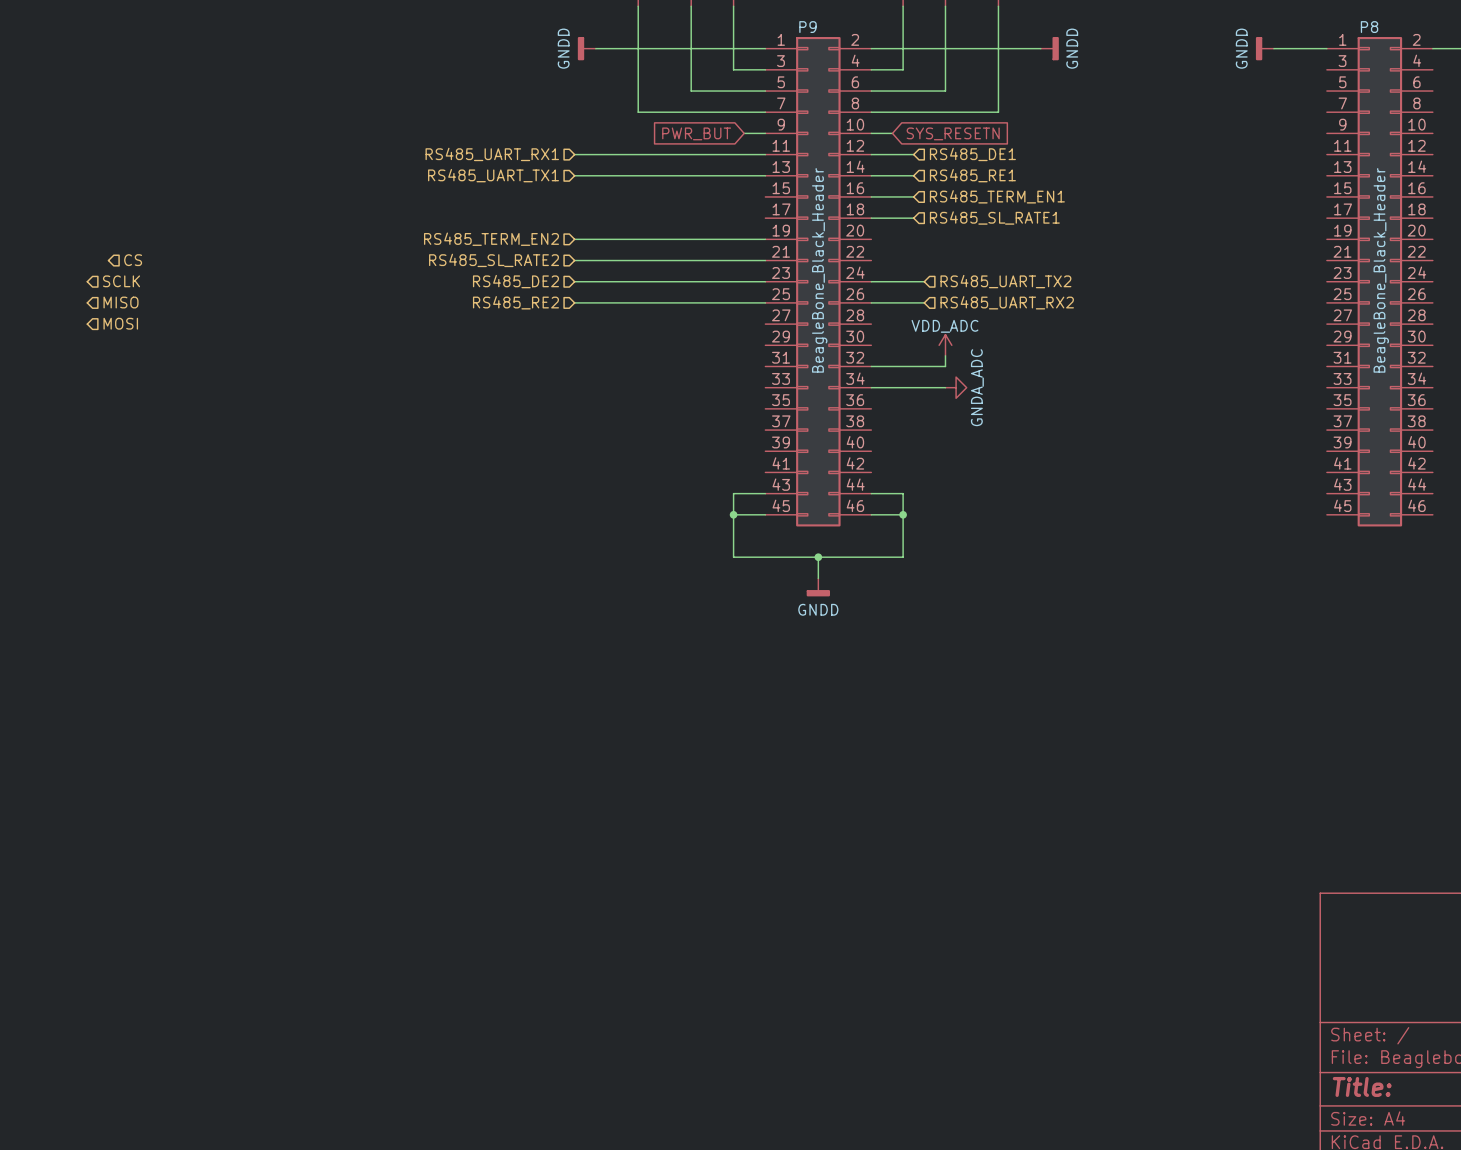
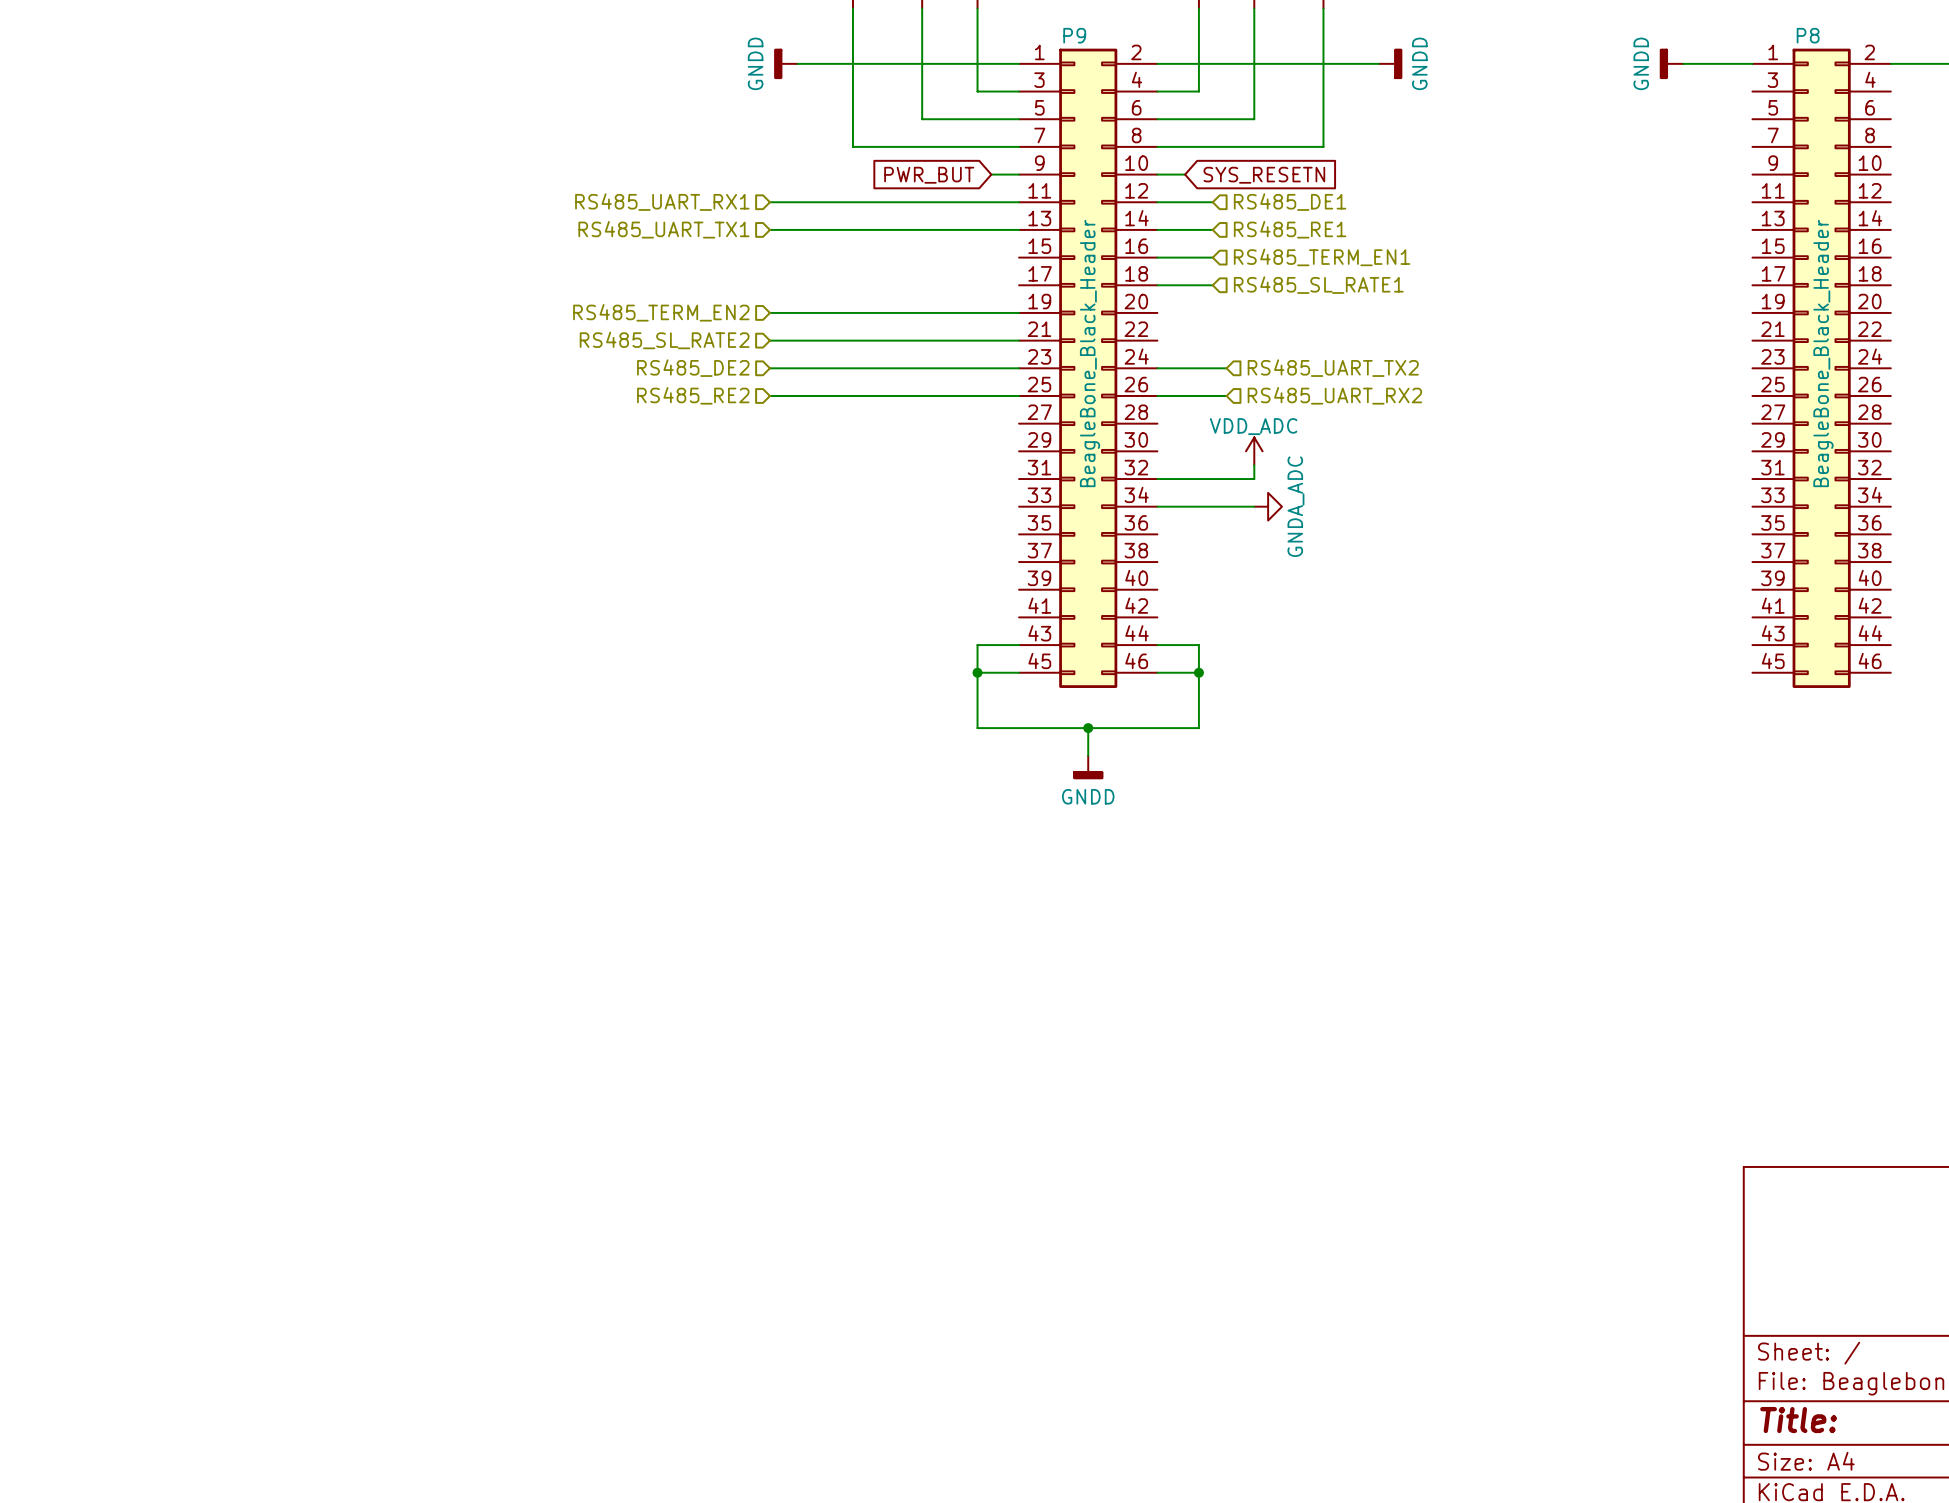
hierarchical label: CS (133, 260) -> none
hierarchical label: SCLK (121, 281) -> none
hierarchical label: MISO (121, 302) -> none
hierarchical label: MOSI (120, 323) -> none

